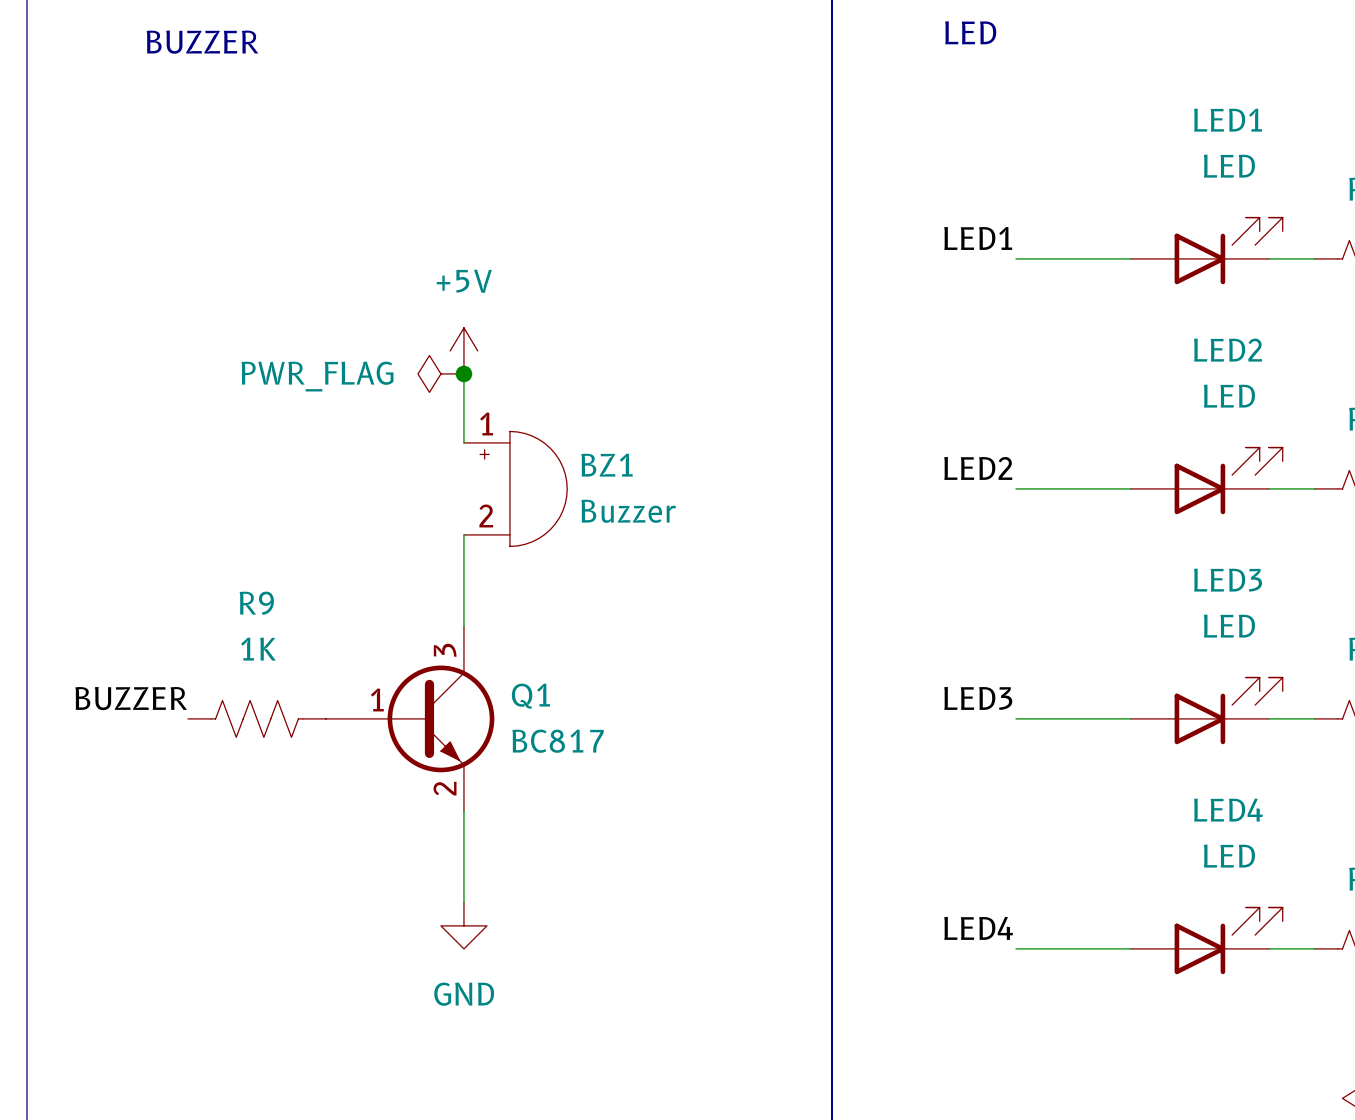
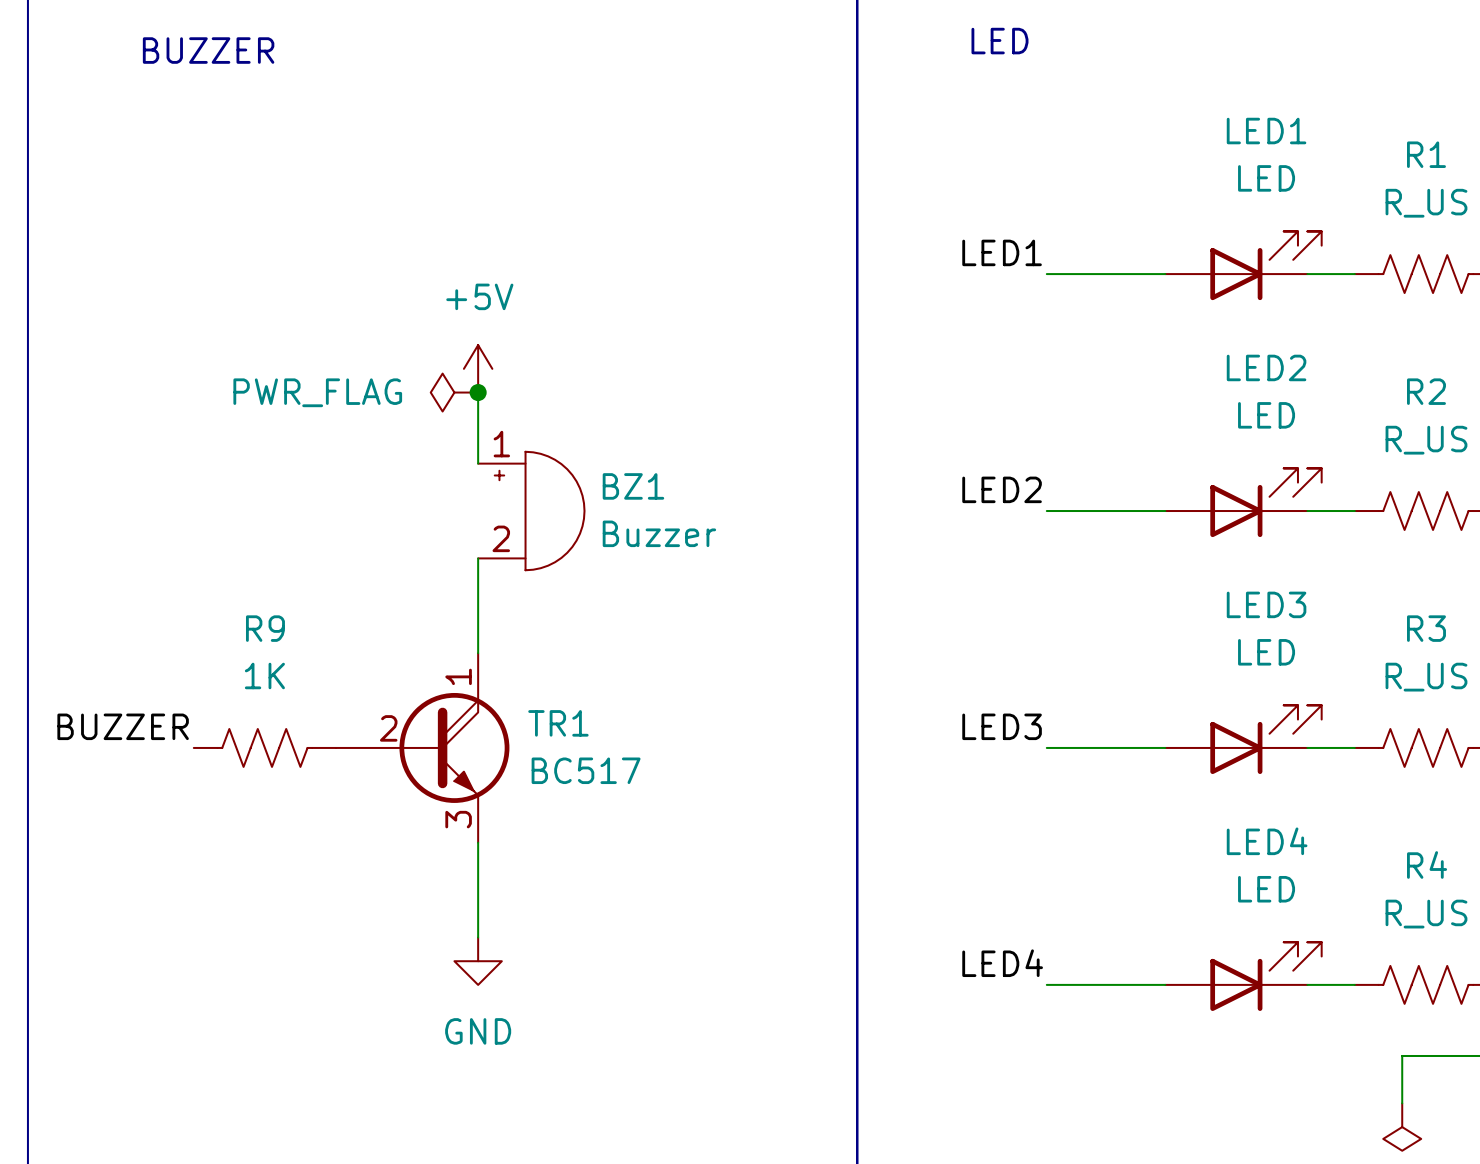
Q1: BC817 (410, 718) -> none
TR1: none -> BC517 (422, 747)

